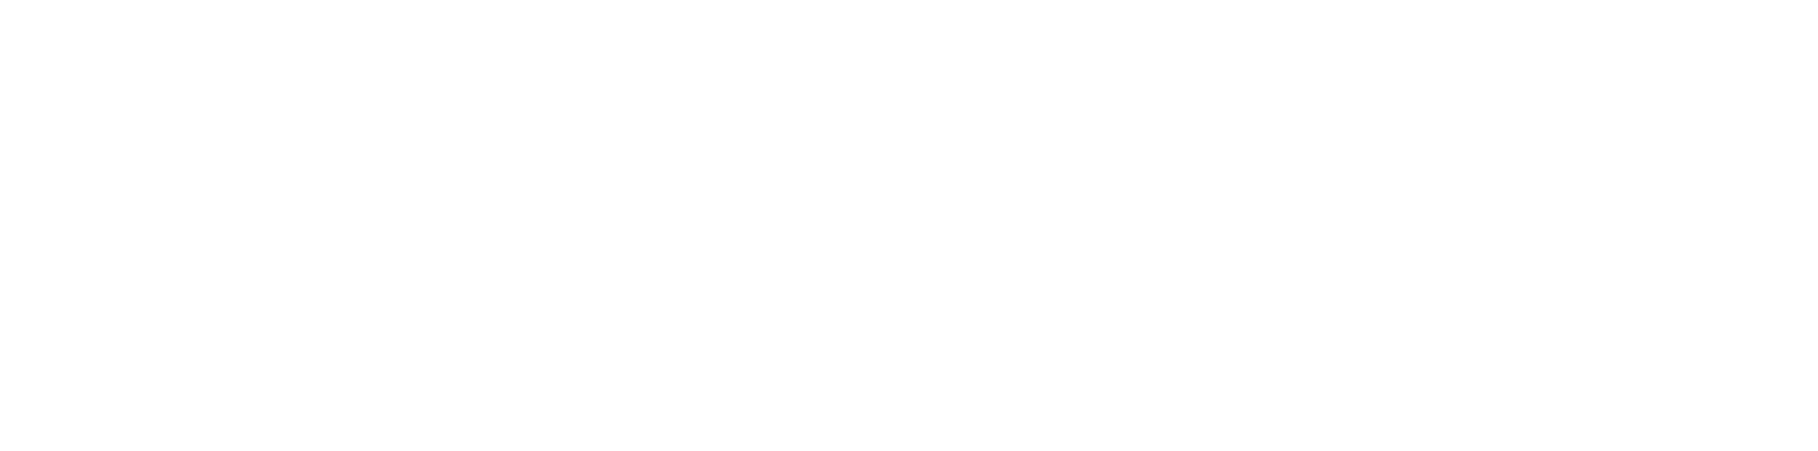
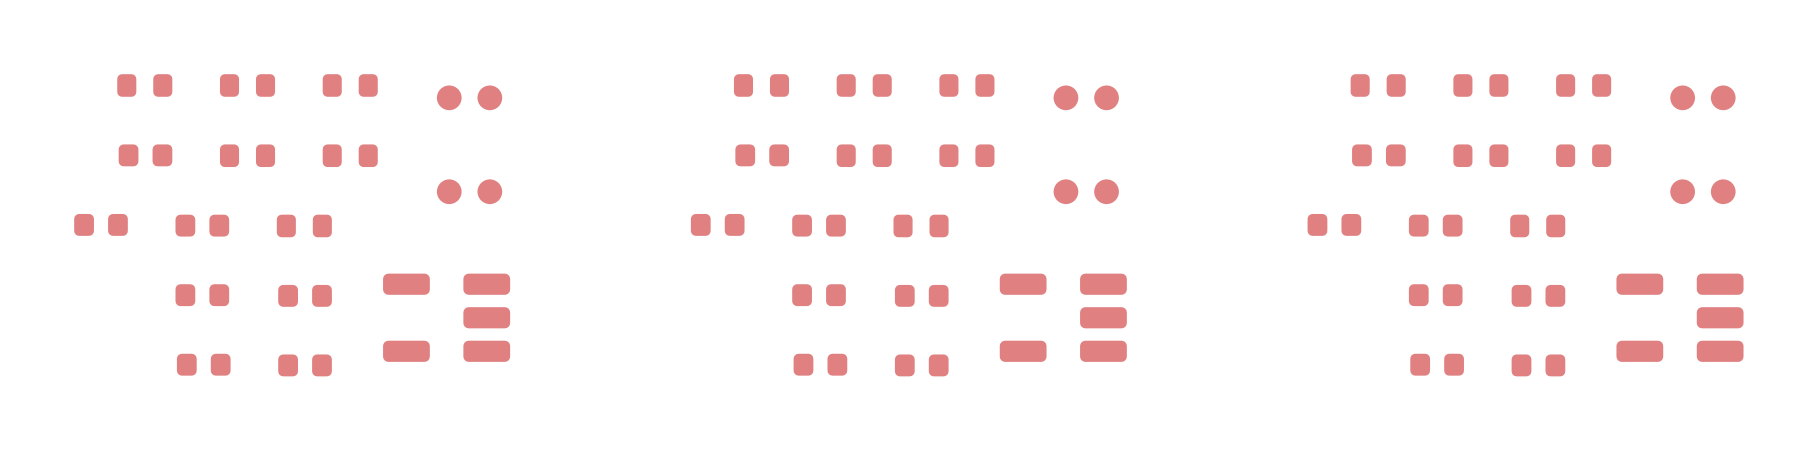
part: none -> (144, 85)
part: none -> (247, 85)
part: none -> (350, 85)
part: none -> (761, 85)
part: none -> (864, 85)
part: none -> (966, 85)
part: none -> (1378, 85)
part: none -> (1480, 85)
part: none -> (1583, 85)
part: none -> (469, 144)
part: none -> (1086, 144)
part: none -> (1702, 144)
part: none -> (145, 155)
part: none -> (247, 155)
part: none -> (350, 155)
part: none -> (762, 155)
part: none -> (864, 155)
part: none -> (966, 155)
part: none -> (1378, 155)
part: none -> (1480, 155)
part: none -> (1583, 155)
part: none -> (101, 224)
part: none -> (717, 224)
part: none -> (1334, 224)
part: none -> (202, 225)
part: none -> (304, 225)
part: none -> (819, 225)
part: none -> (921, 225)
part: none -> (1435, 225)
part: none -> (1537, 225)
part: none -> (202, 295)
part: none -> (305, 295)
part: none -> (819, 295)
part: none -> (921, 295)
part: none -> (1435, 295)
part: none -> (1538, 295)
part: none -> (446, 317)
part: none -> (1063, 317)
part: none -> (1679, 317)
part: none -> (203, 364)
part: none -> (820, 364)
part: none -> (1437, 364)
part: none -> (305, 365)
part: none -> (921, 365)
part: none -> (1538, 365)

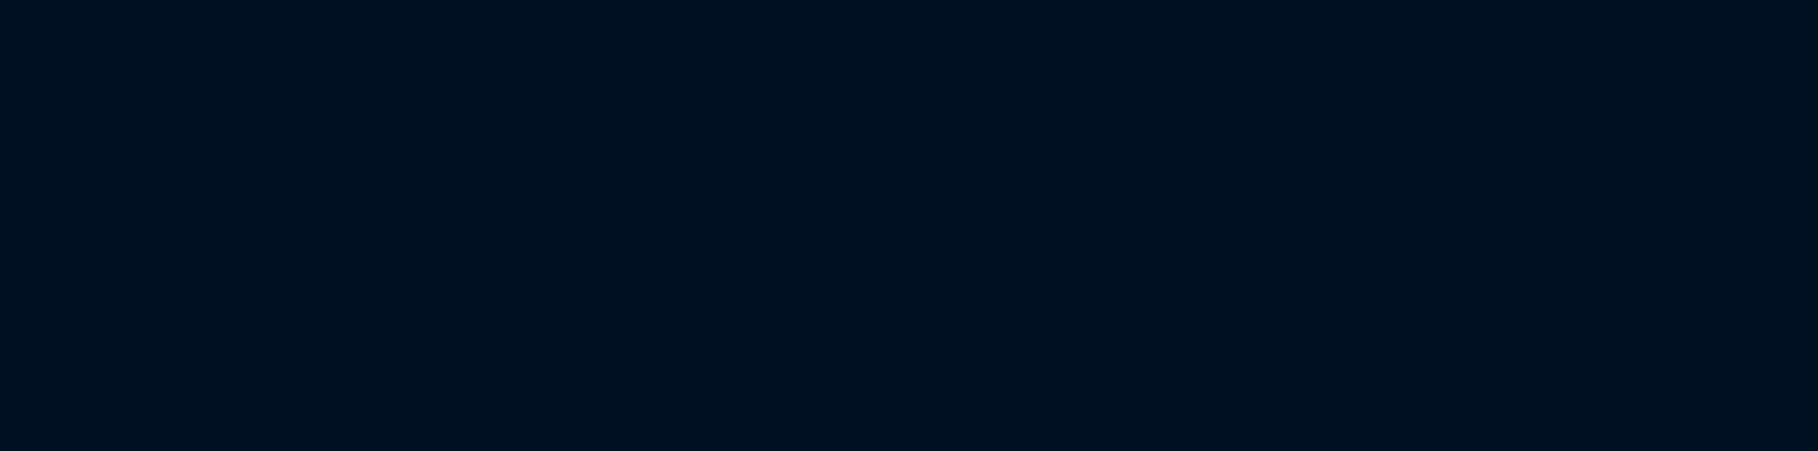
part: (144, 85) -> none
part: (247, 85) -> none
part: (350, 85) -> none
part: (761, 85) -> none
part: (864, 85) -> none
part: (966, 85) -> none
part: (1378, 85) -> none
part: (1480, 85) -> none
part: (1583, 85) -> none
part: (469, 144) -> none
part: (1086, 144) -> none
part: (1702, 144) -> none
part: (145, 155) -> none
part: (247, 155) -> none
part: (350, 155) -> none
part: (762, 155) -> none
part: (864, 155) -> none
part: (966, 155) -> none
part: (1378, 155) -> none
part: (1480, 155) -> none
part: (1583, 155) -> none
part: (101, 224) -> none
part: (717, 224) -> none
part: (1334, 224) -> none
part: (202, 225) -> none
part: (304, 225) -> none
part: (819, 225) -> none
part: (921, 225) -> none
part: (1435, 225) -> none
part: (1537, 225) -> none
part: (202, 295) -> none
part: (305, 295) -> none
part: (819, 295) -> none
part: (921, 295) -> none
part: (1435, 295) -> none
part: (1538, 295) -> none
part: (446, 317) -> none
part: (1063, 317) -> none
part: (1679, 317) -> none
part: (203, 364) -> none
part: (820, 364) -> none
part: (1437, 364) -> none
part: (305, 365) -> none
part: (921, 365) -> none
part: (1538, 365) -> none

